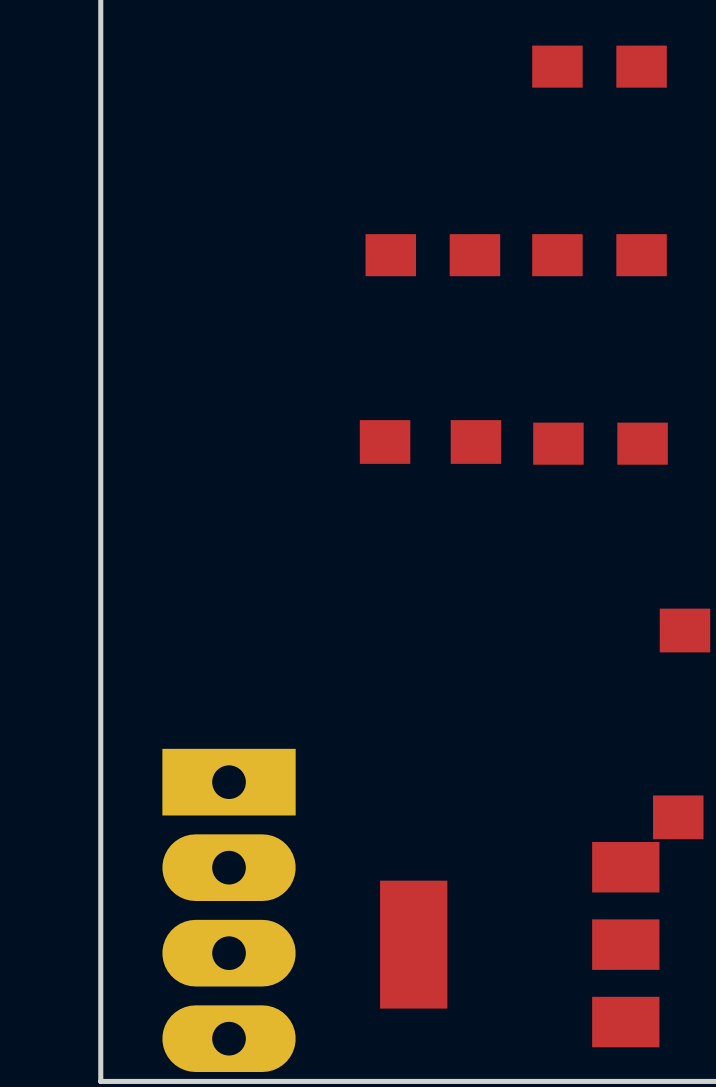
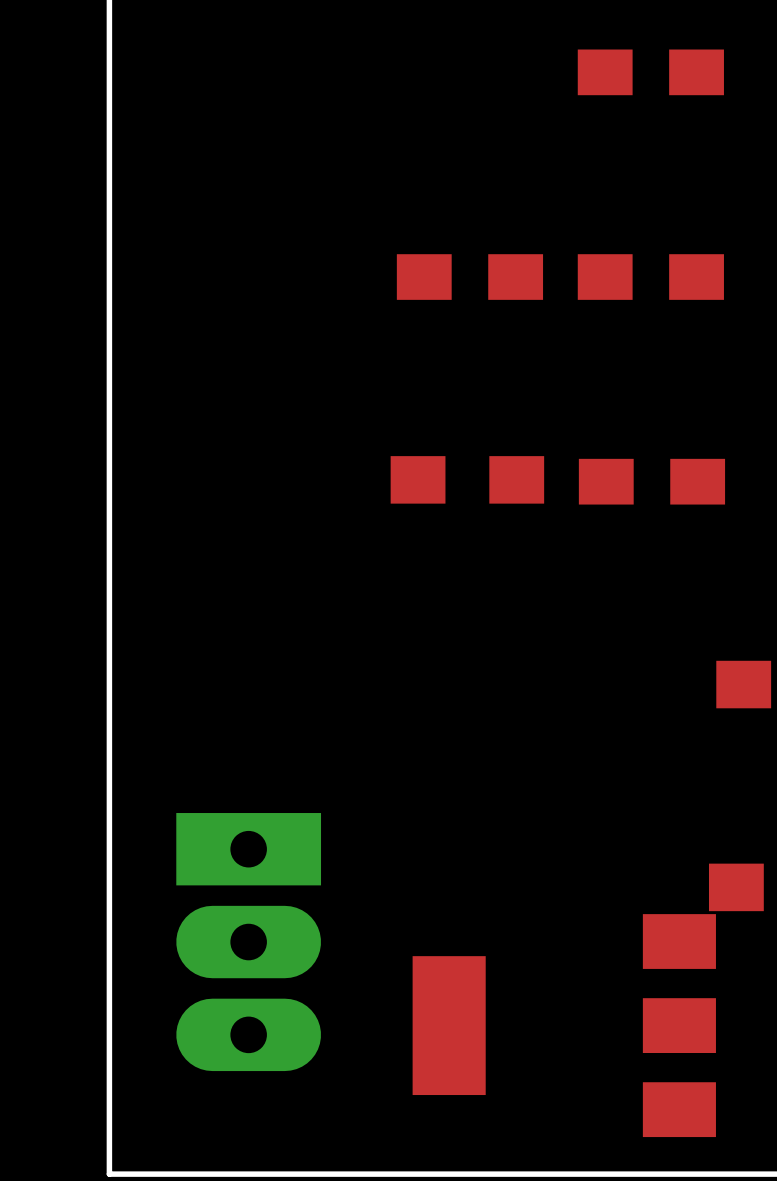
part: (229, 910) -> none

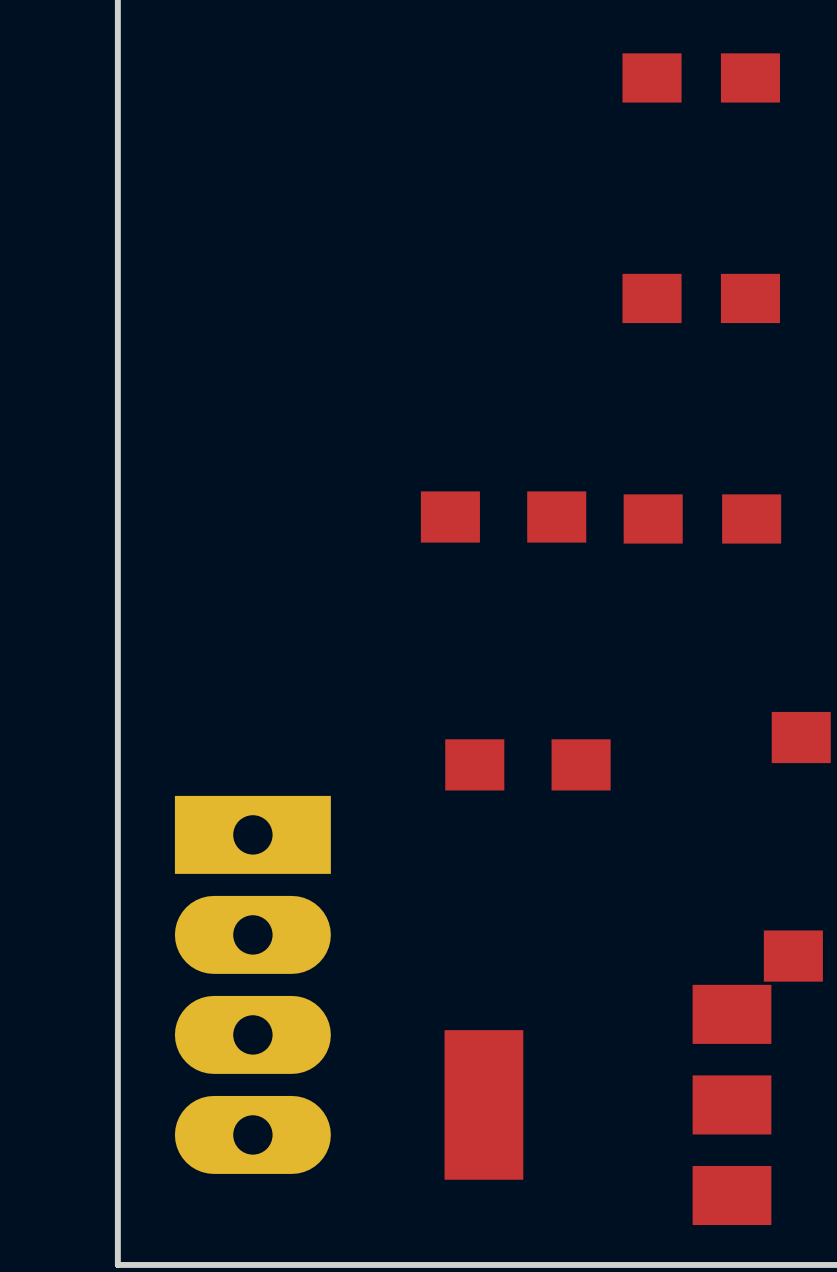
part: (469, 277) -> none
part: none -> (527, 764)
part footprint: [176, 813, 322, 1072] -> [174, 795, 331, 1174]

